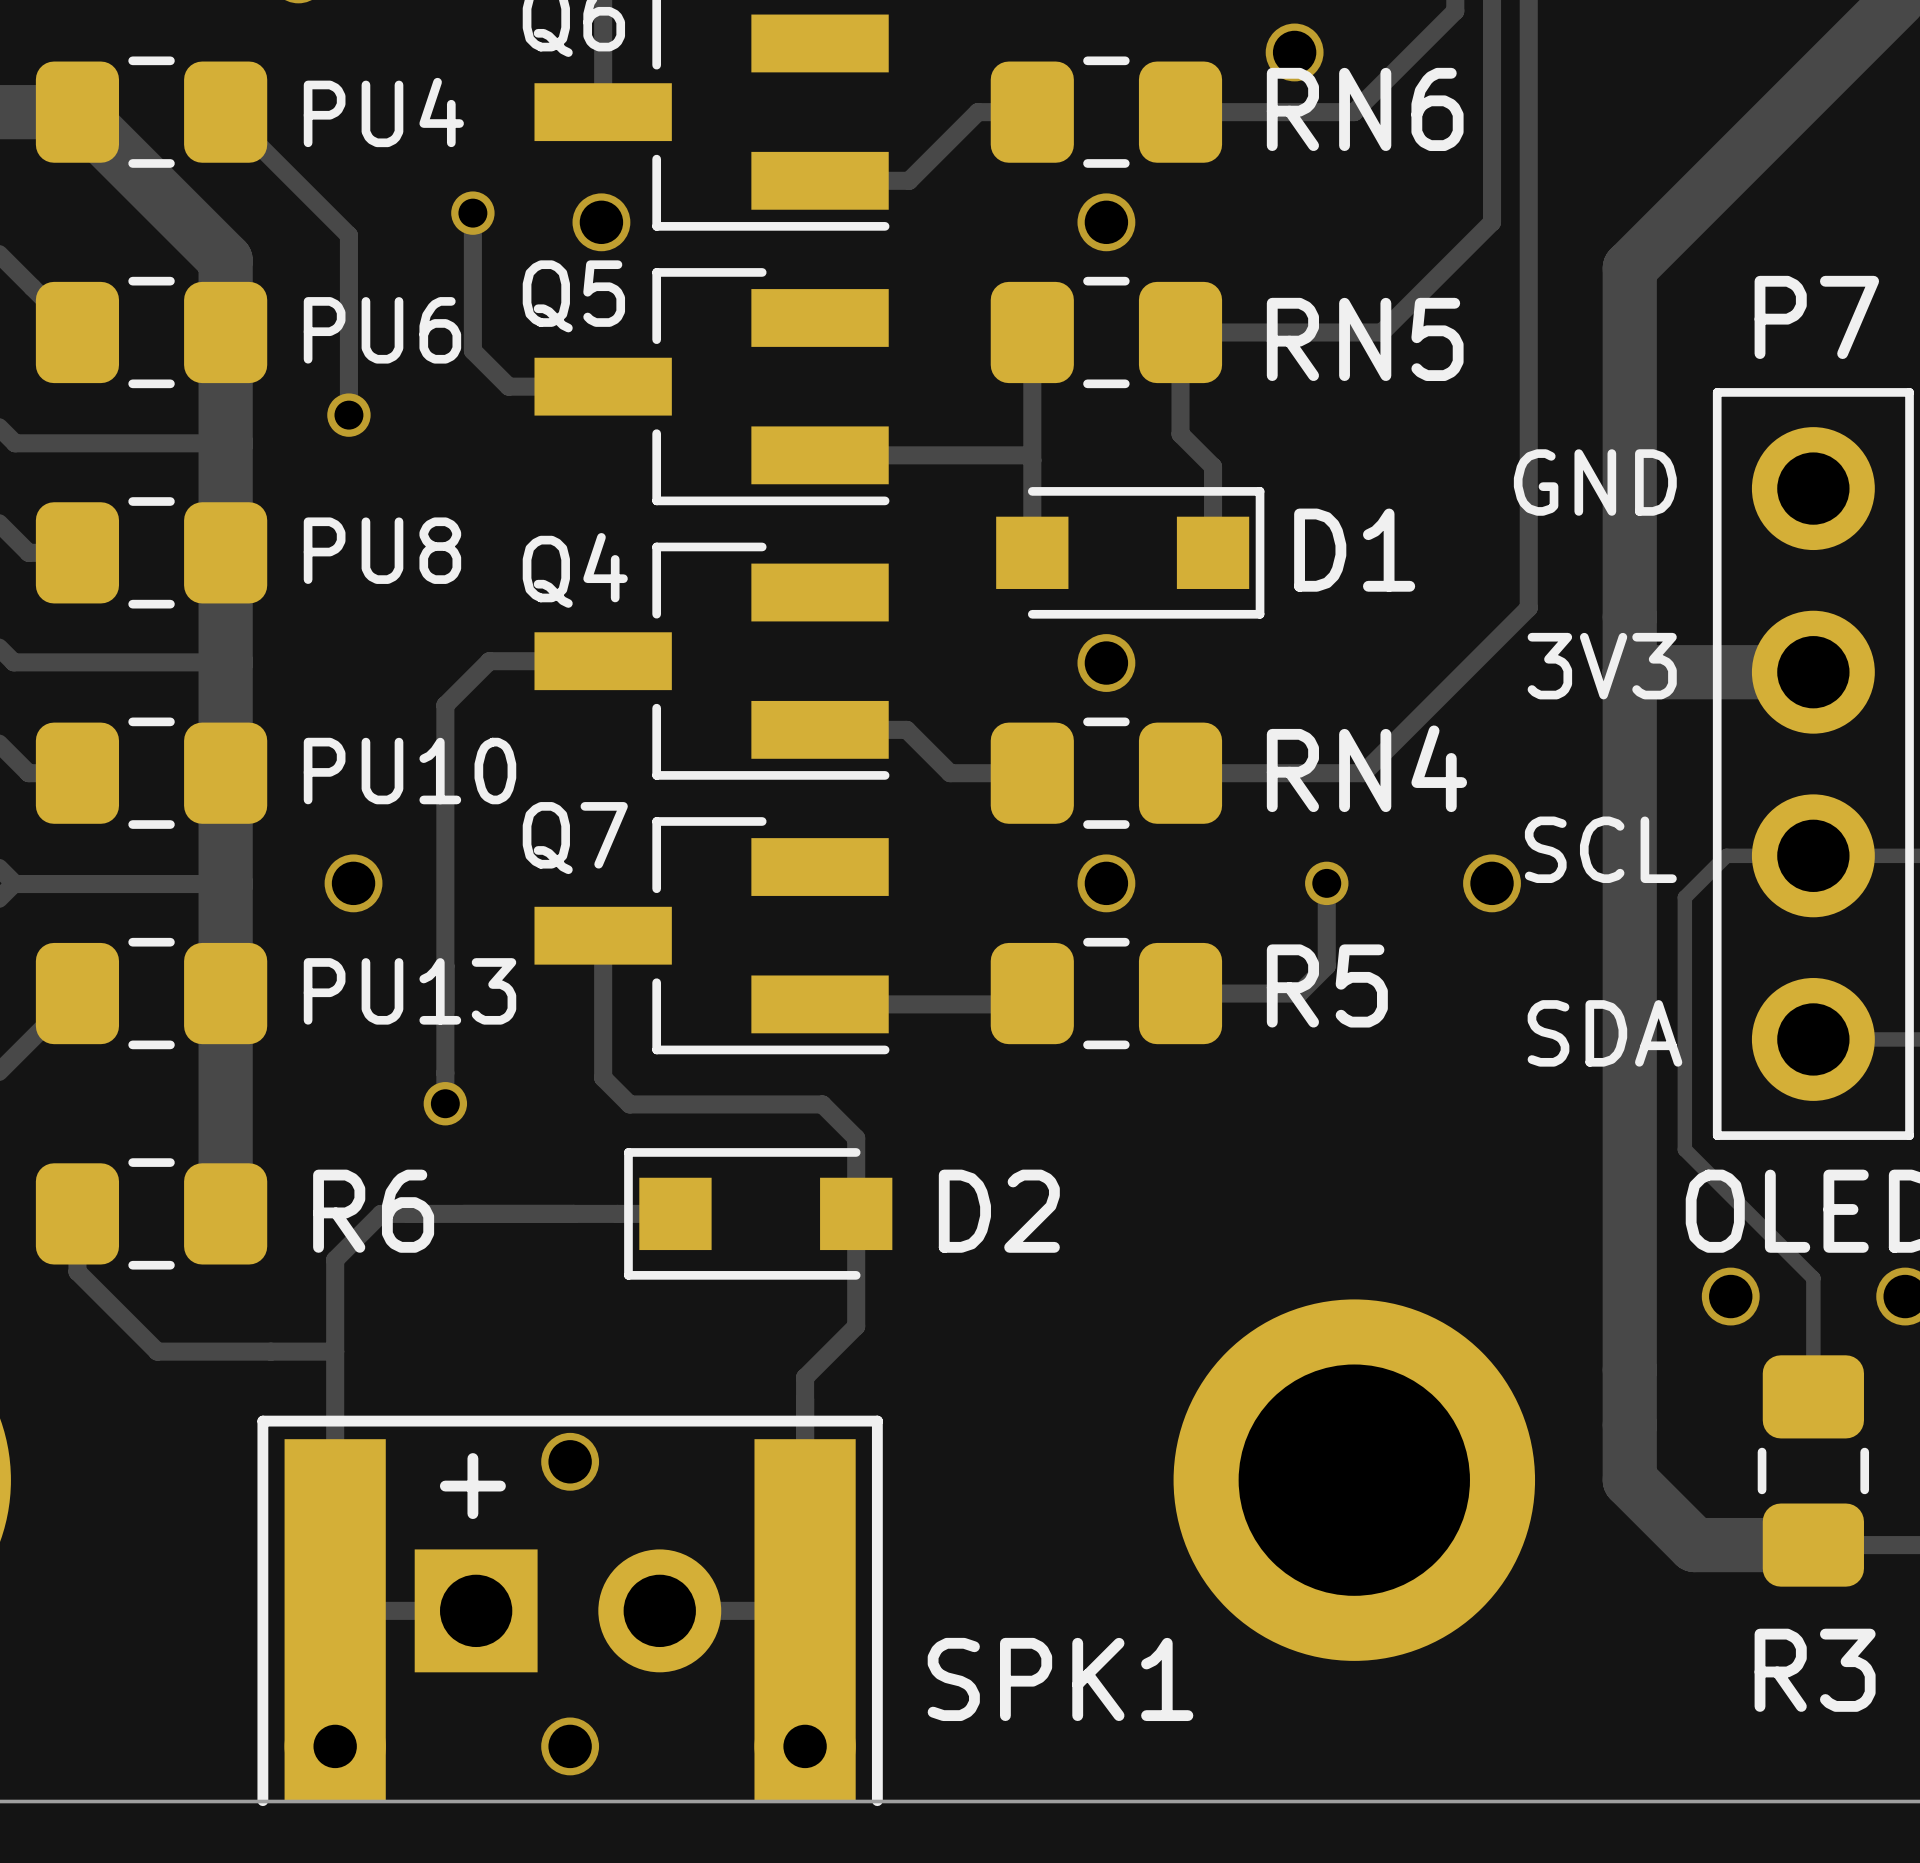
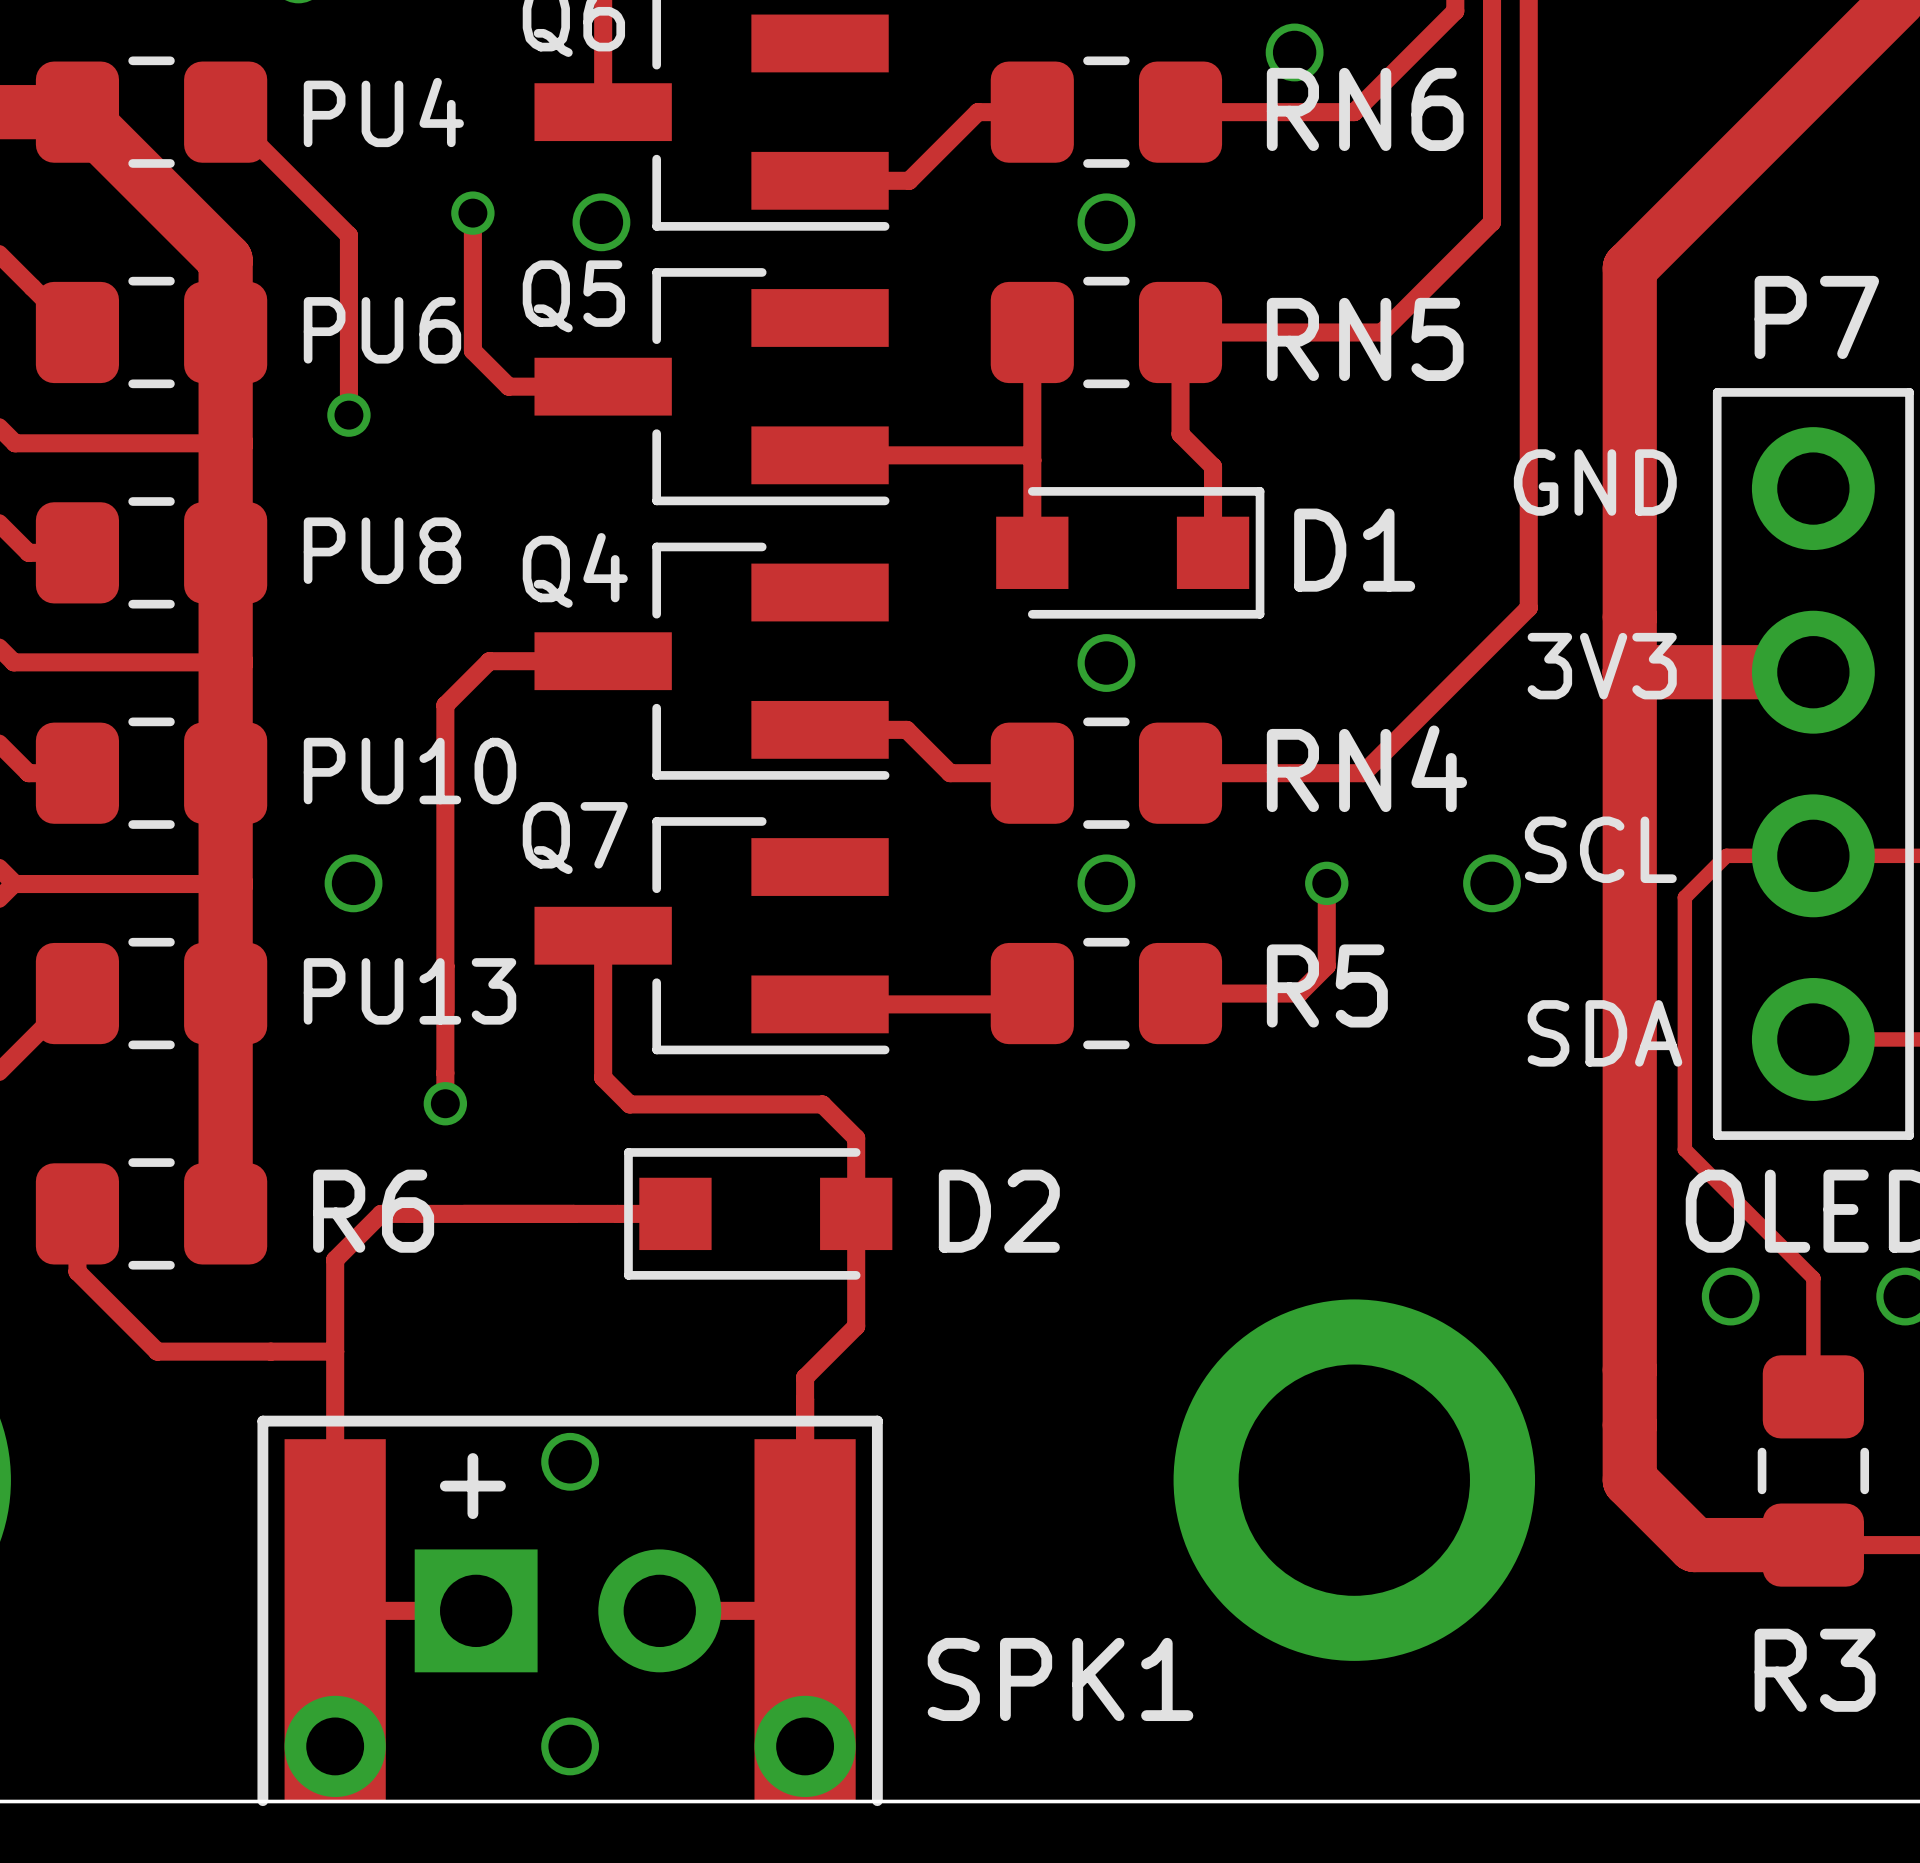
SPK1 footprint: [257, 1415, 883, 1807] -> [257, 1415, 883, 1807]

